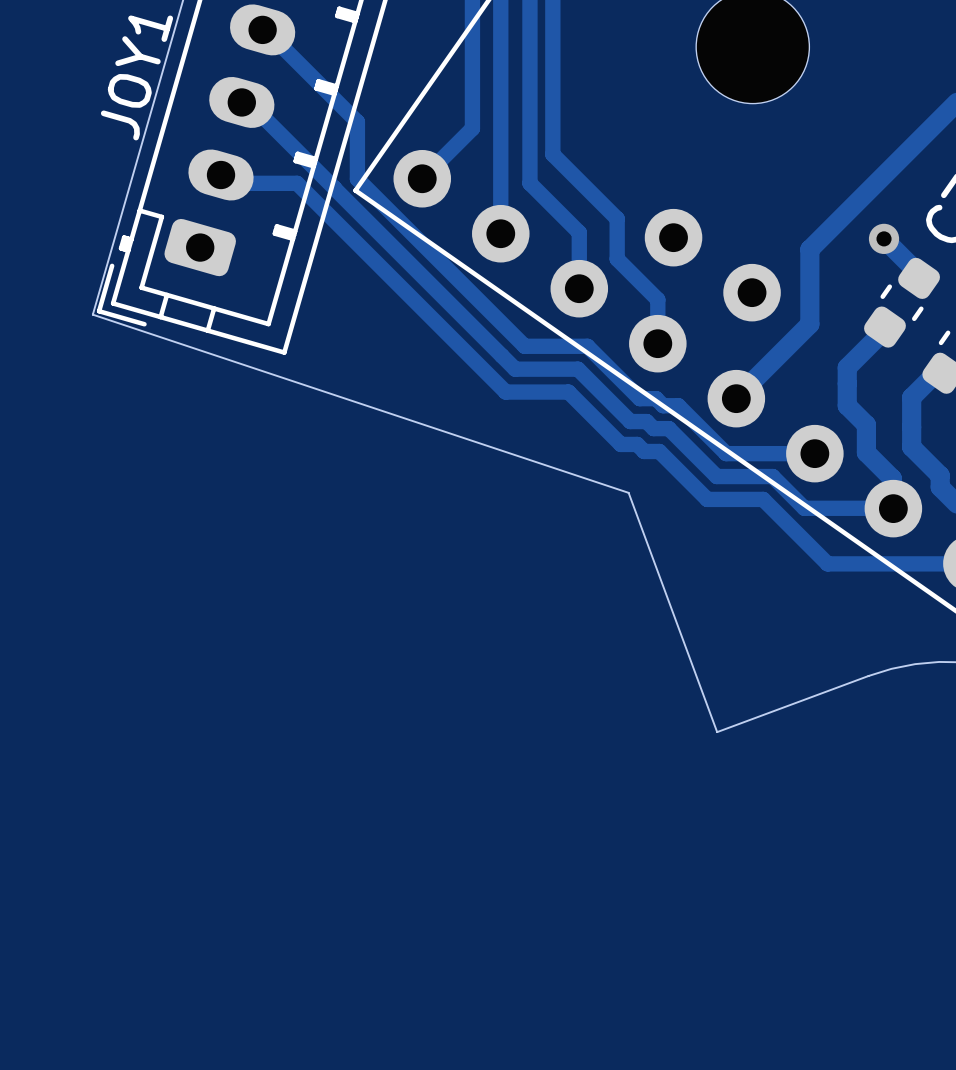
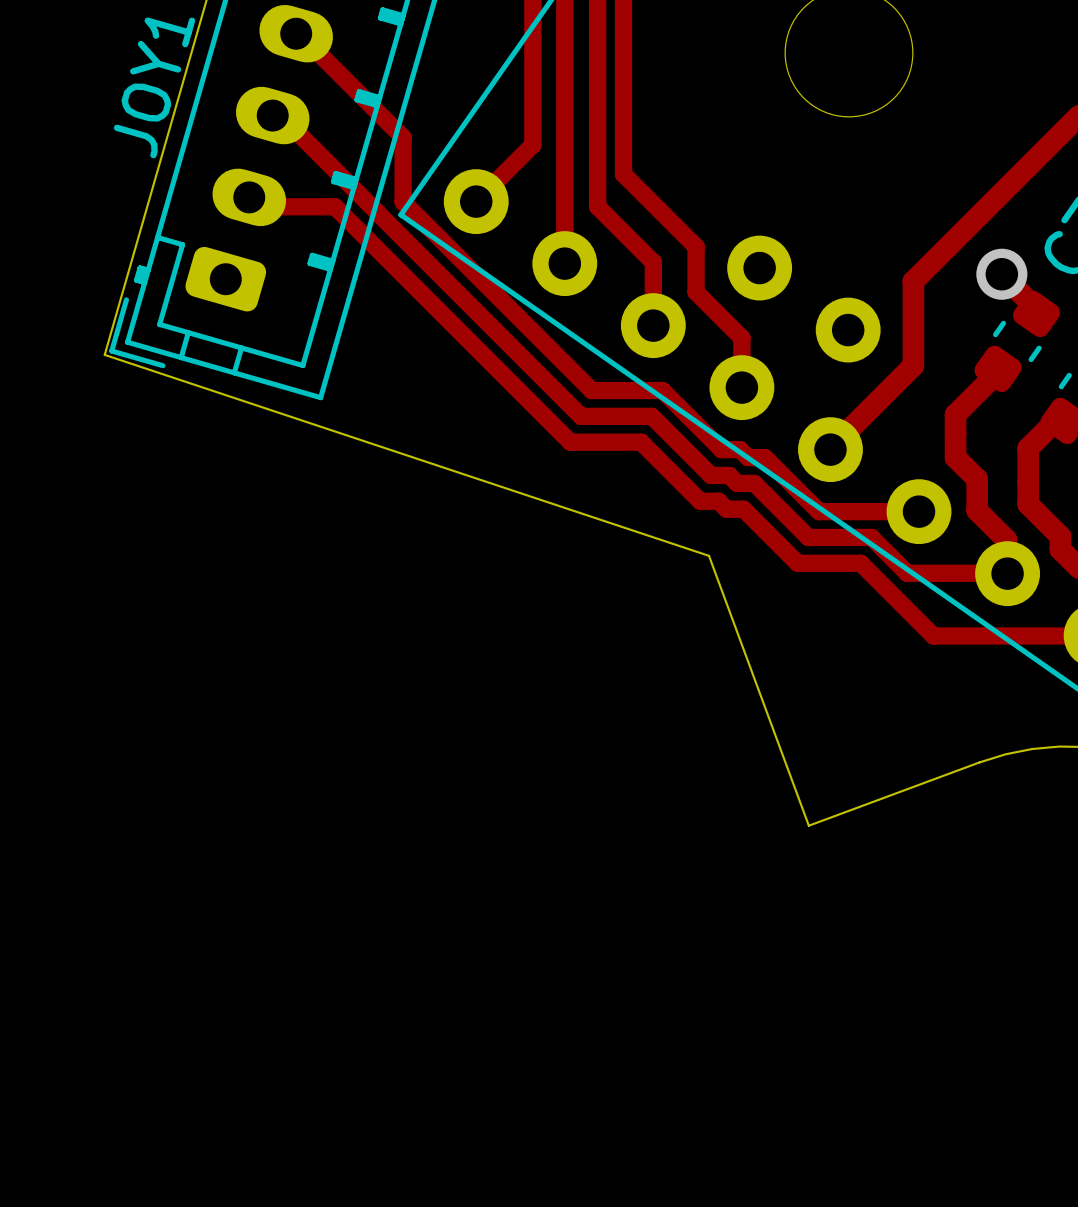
via size: [868, 223, 900, 254] -> [976, 248, 1028, 300]

